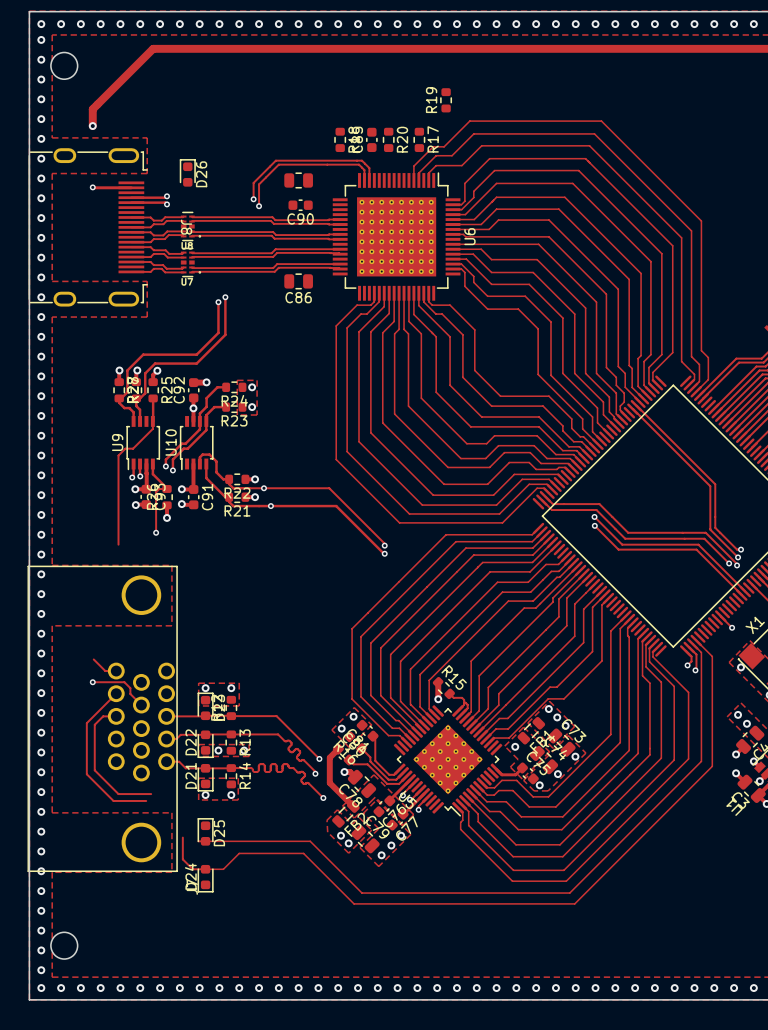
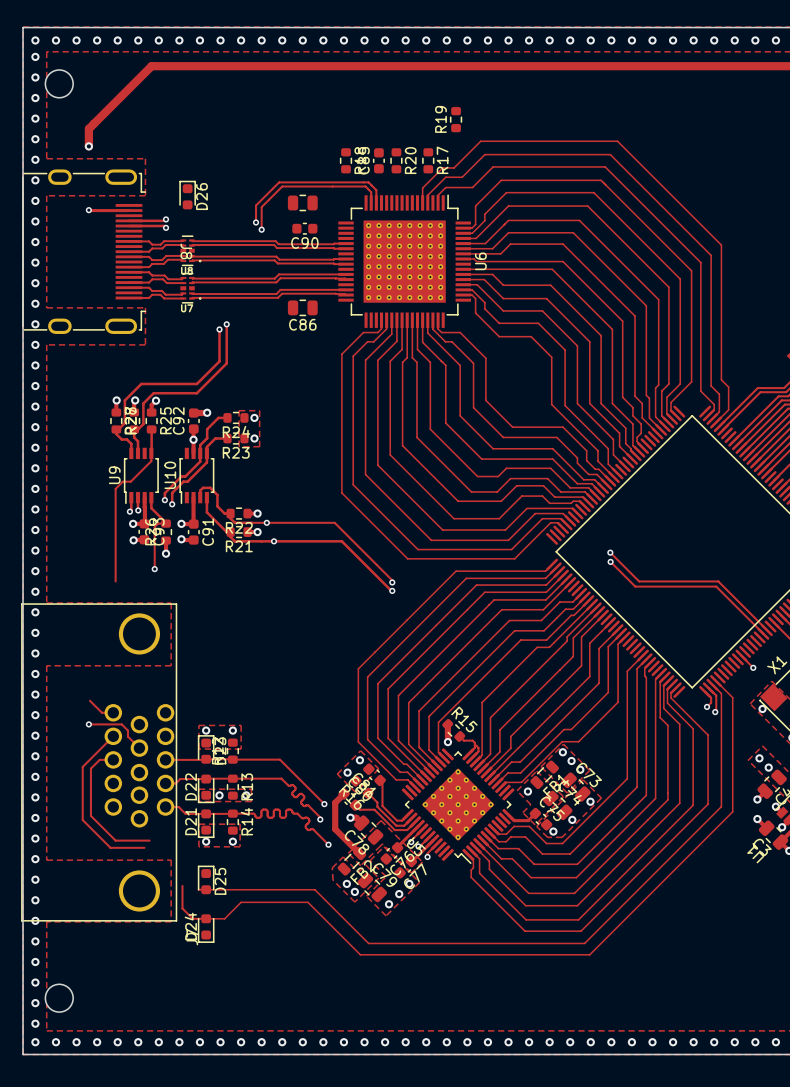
track: (636, 405) (715, 484) (715, 527) (737, 549) (741, 549) -> none
track: (632, 409) (710, 486) (710, 529) (738, 557) -> none
track: (545, 496) (552, 504) (599, 504) (628, 532) (705, 532) (737, 565) -> none
track: (541, 500) (551, 510) (596, 510) (625, 538) (704, 538) (729, 563) -> none
via: (741, 549) -> none
via: (738, 557) -> none
via: (729, 563) -> none
via: (737, 565) -> none

